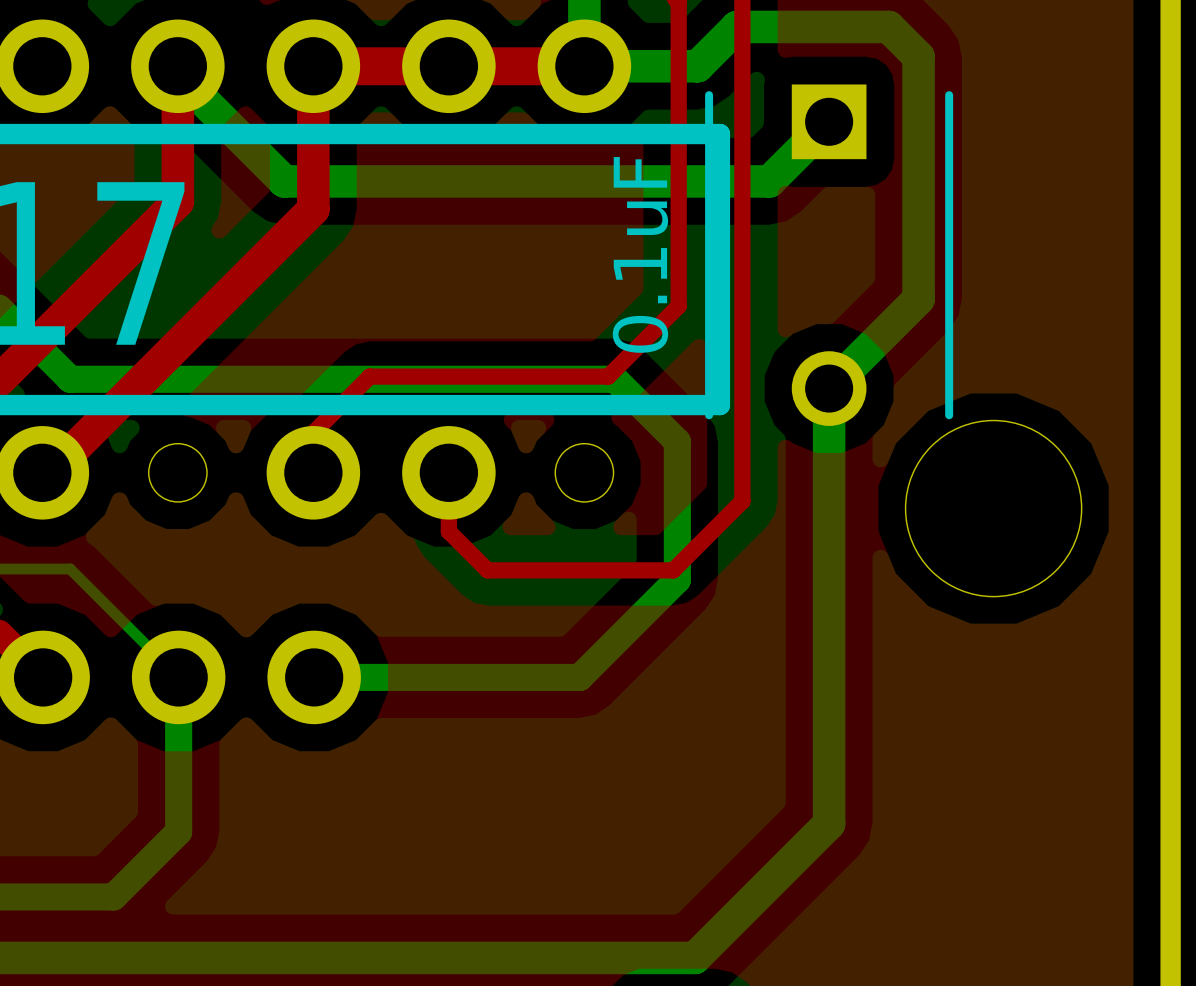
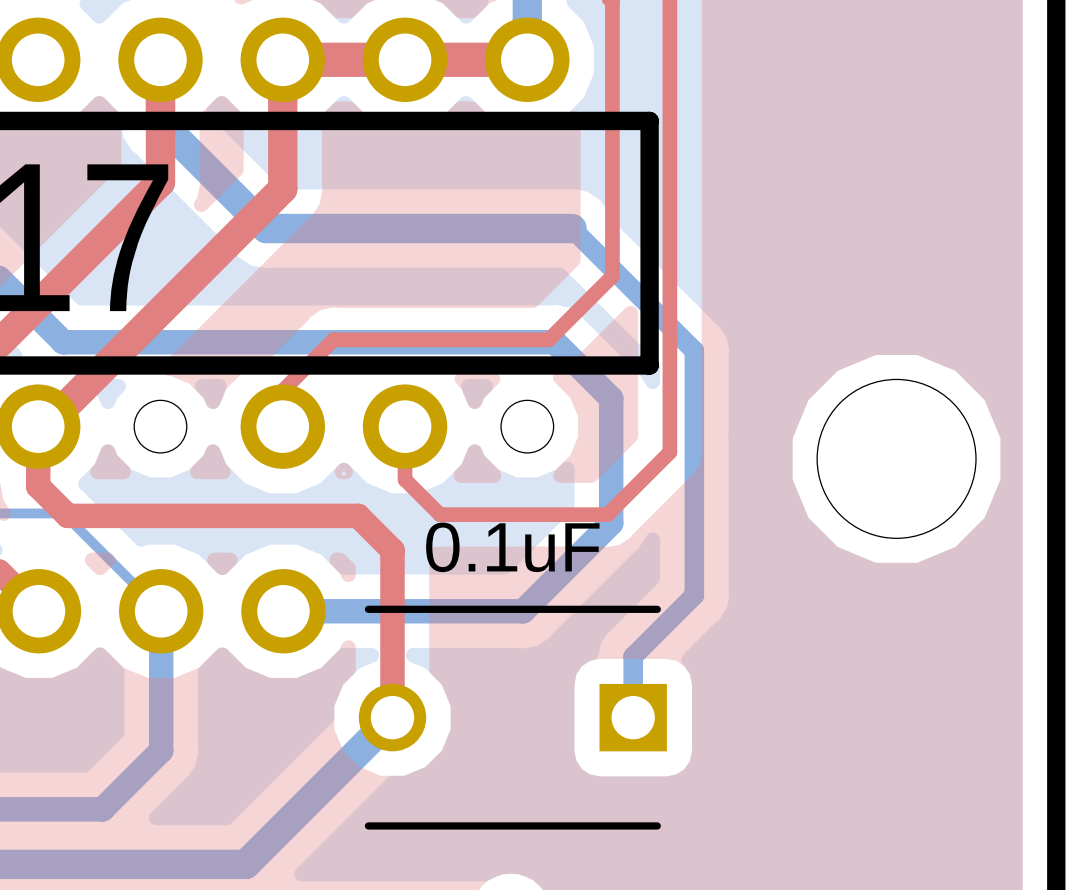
bottom track: (584, 66) (697, 66) (736, 26) (888, 26) (918, 56) (918, 299) (829, 388) (829, 823) (694, 957) (272, 957) -> (392, 717) (245, 864)
bottom track: (177, 74) (284, 181) (769, 181) (829, 121) -> (160, 67) (160, 122) (266, 228) (572, 228) (694, 350) (694, 595) (633, 656) (633, 717)
part rotation: 0° (829, 255) -> 90° clockwise (512, 717)
part position: (829, 255) -> (512, 717)
top track: none -> (38, 426) (38, 486) (67, 515) (358, 515) (392, 550) (392, 717)

